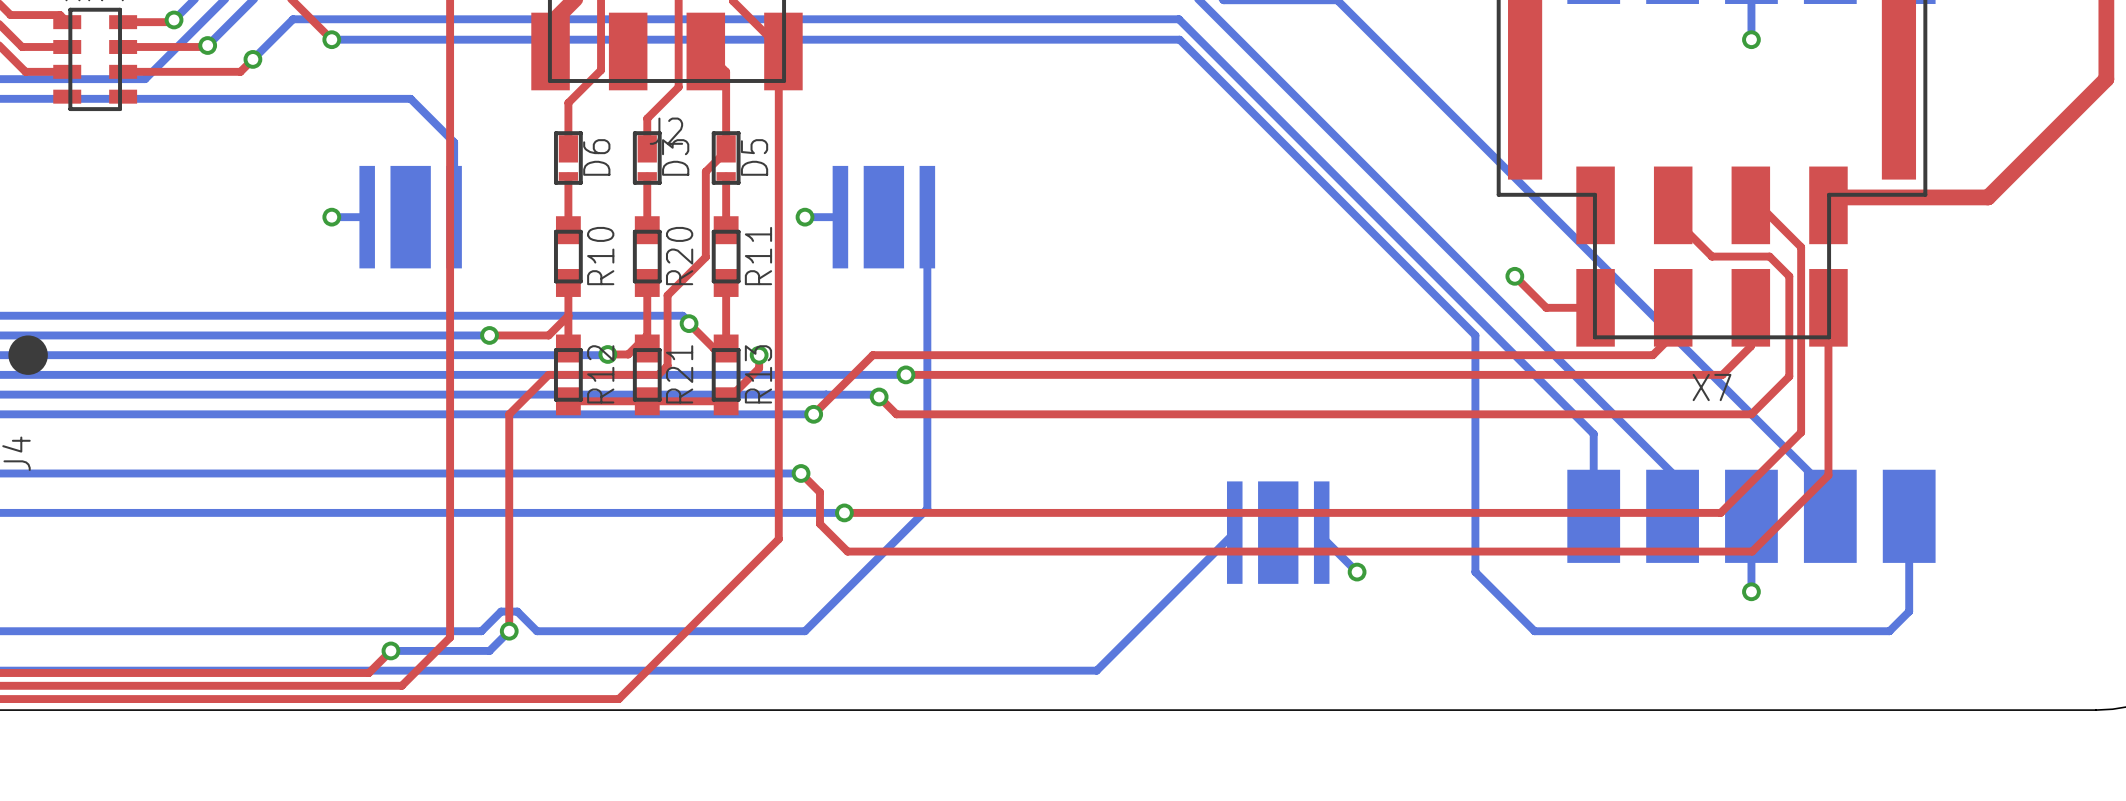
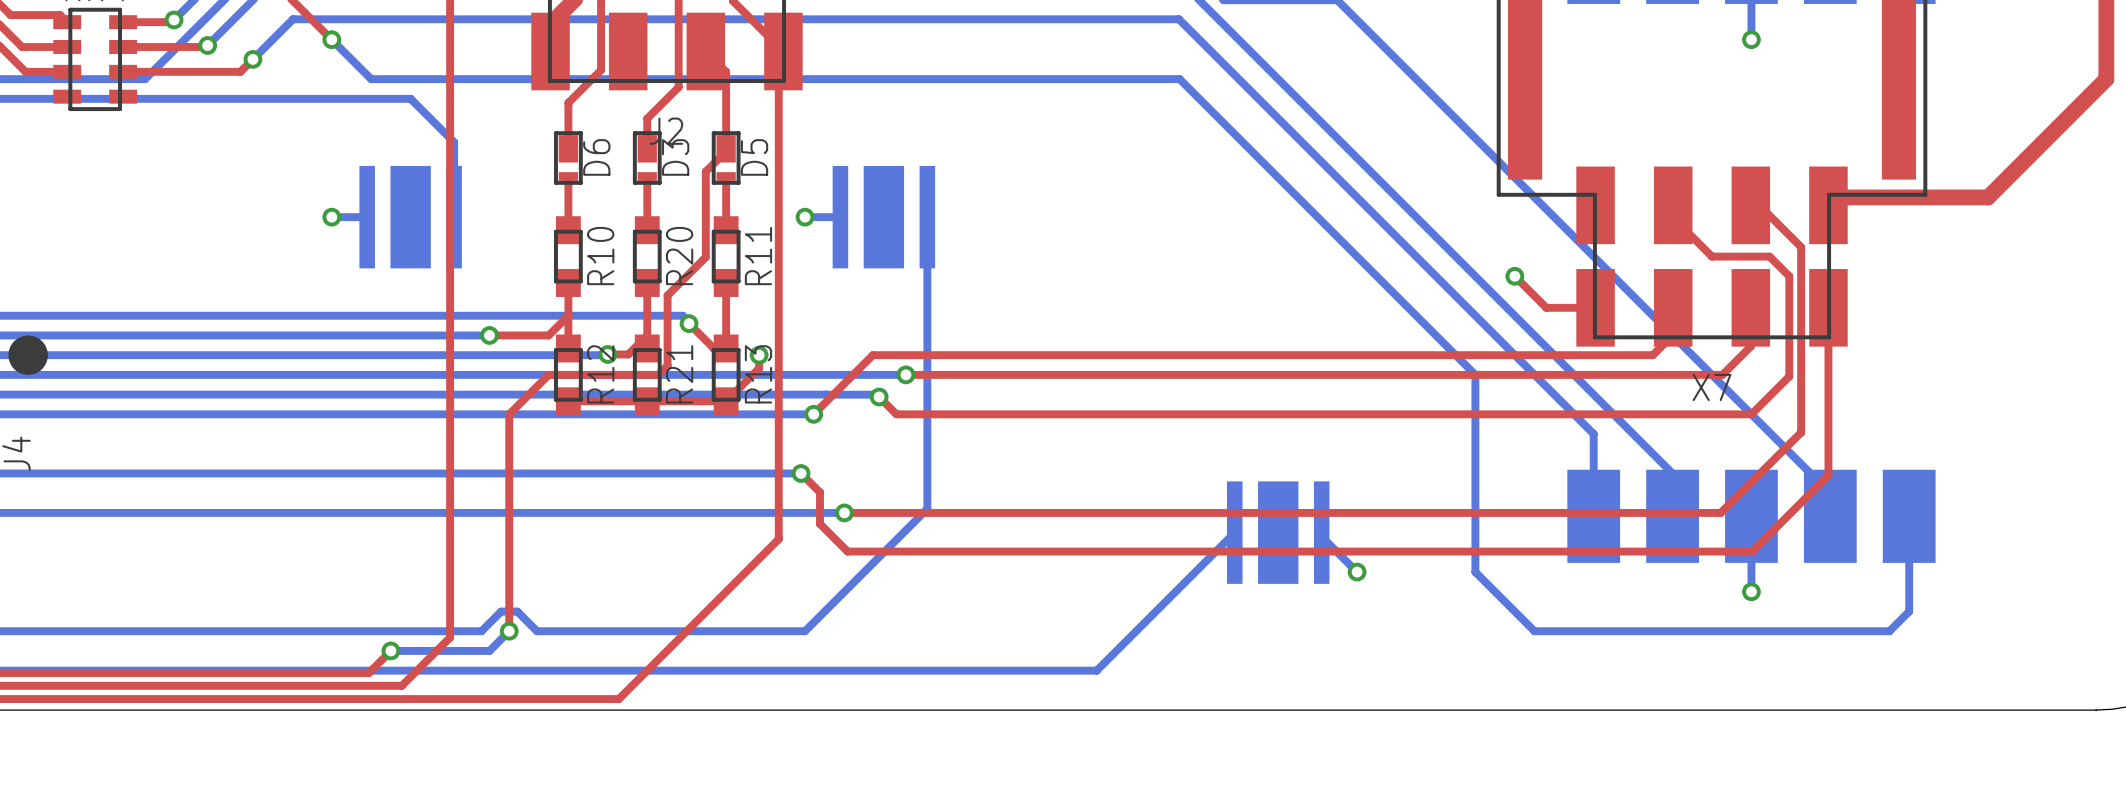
bottom track: (331, 39) (1179, 39) (1475, 335) (1475, 374) -> (331, 39) (371, 79) (1179, 79) (1475, 374)

